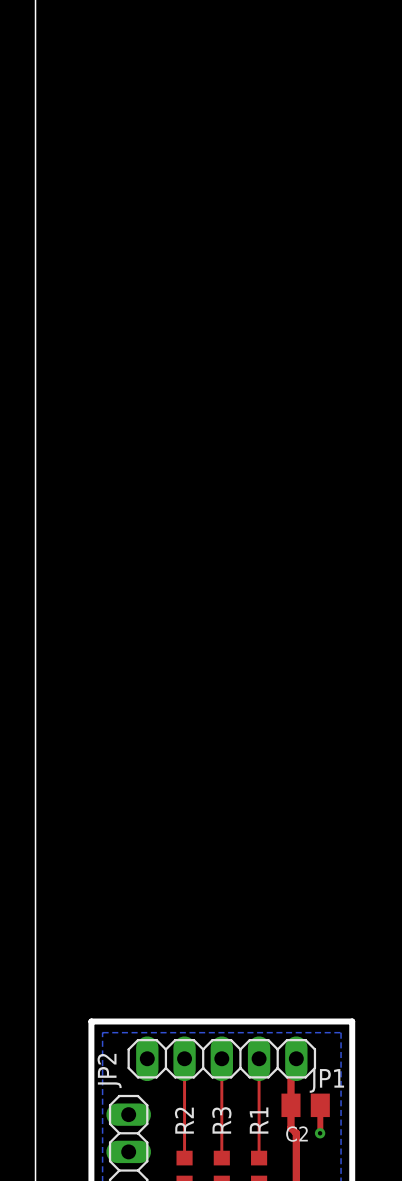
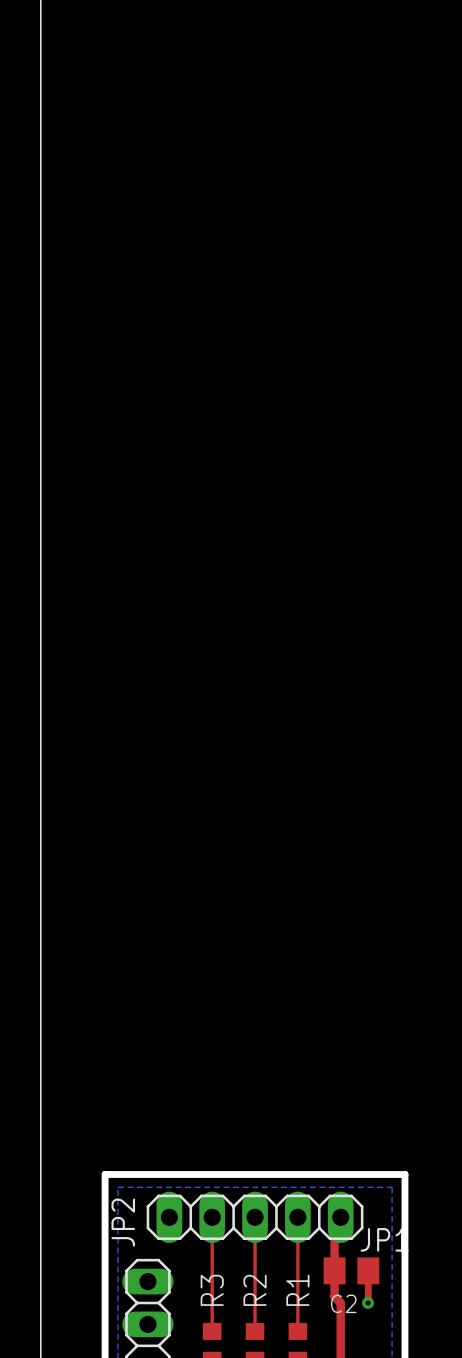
R2 name: R2 (184, 1120) -> R3 (212, 1290)
R3 name: R3 (221, 1120) -> R2 (255, 1290)

